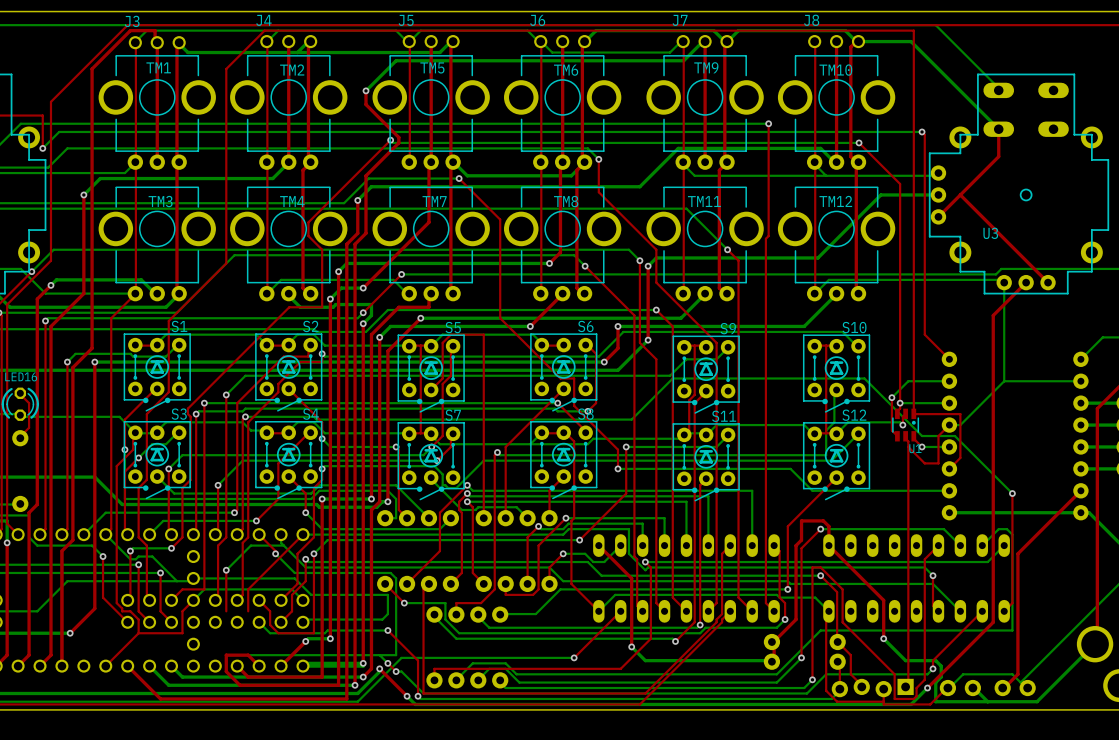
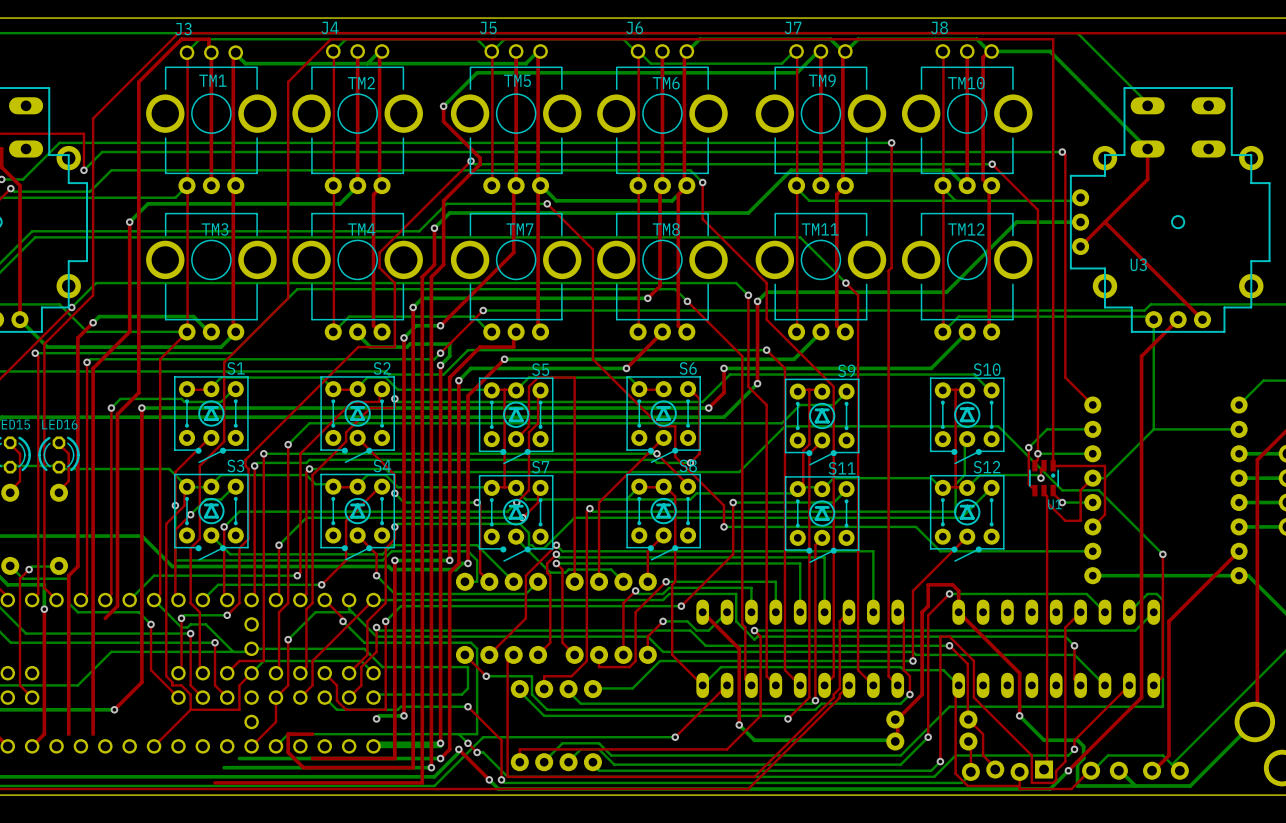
top track: (61, 551) (61, 666) -> none
top track: none -> (288, 685) (275, 697) (275, 721) (251, 746)
top track: (305, 641) (281, 666) -> none
top track: (29, 655) (18, 666) -> none
top track: (50, 655) (40, 666) -> (312, 685) (300, 697)
bottom track: none -> (288, 734) (275, 746)
top track: (248, 655) (259, 666) -> none
top track: (127, 666) (160, 698) -> none
bottom track: (149, 666) (168, 685) -> none
bottom track: (171, 666) (182, 677) -> none
top track: (237, 666) (248, 677) -> none

